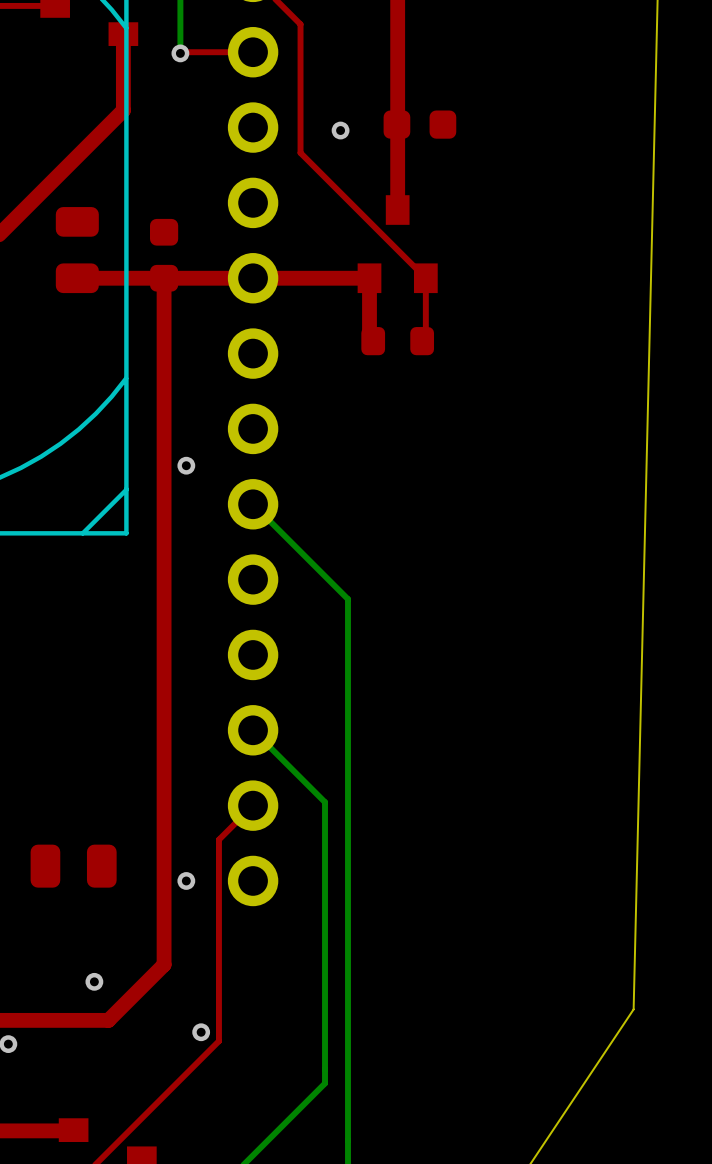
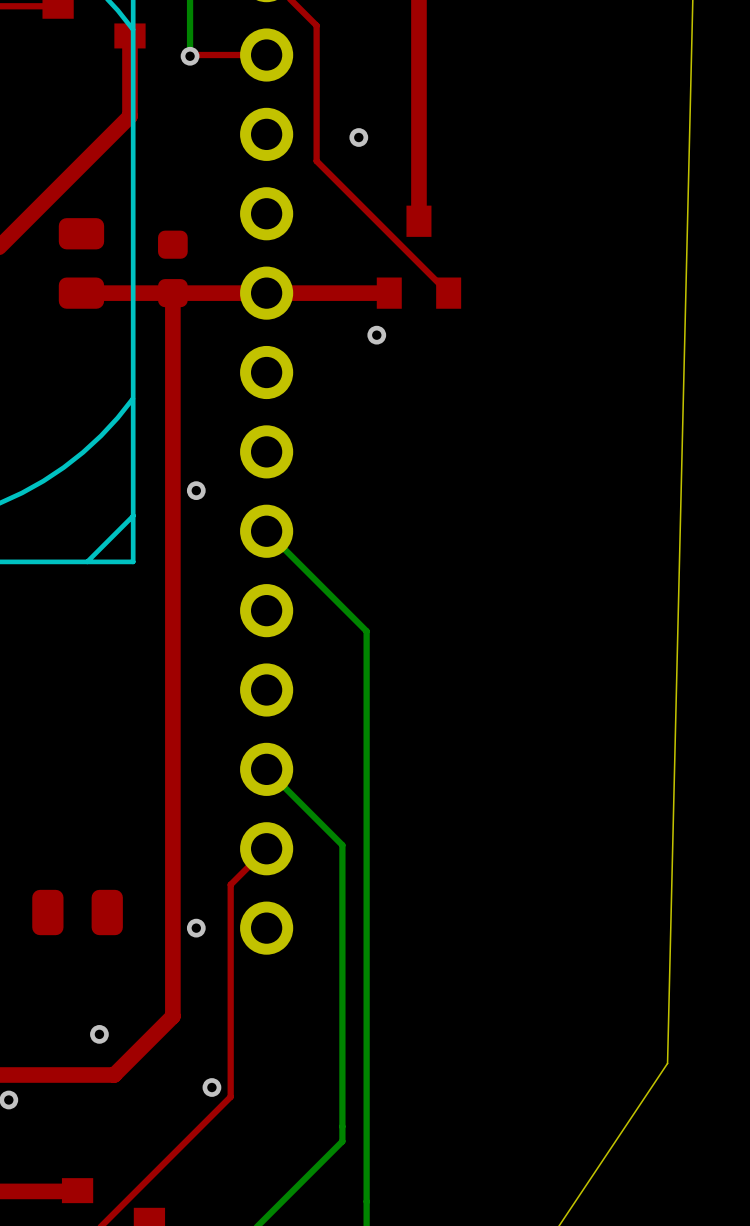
part: (419, 124) -> none
top track: (369, 278) (369, 337) (373, 341) -> none
top track: (425, 278) (425, 337) (422, 341) -> none
via: none -> (376, 335)
part: (397, 341) -> none

